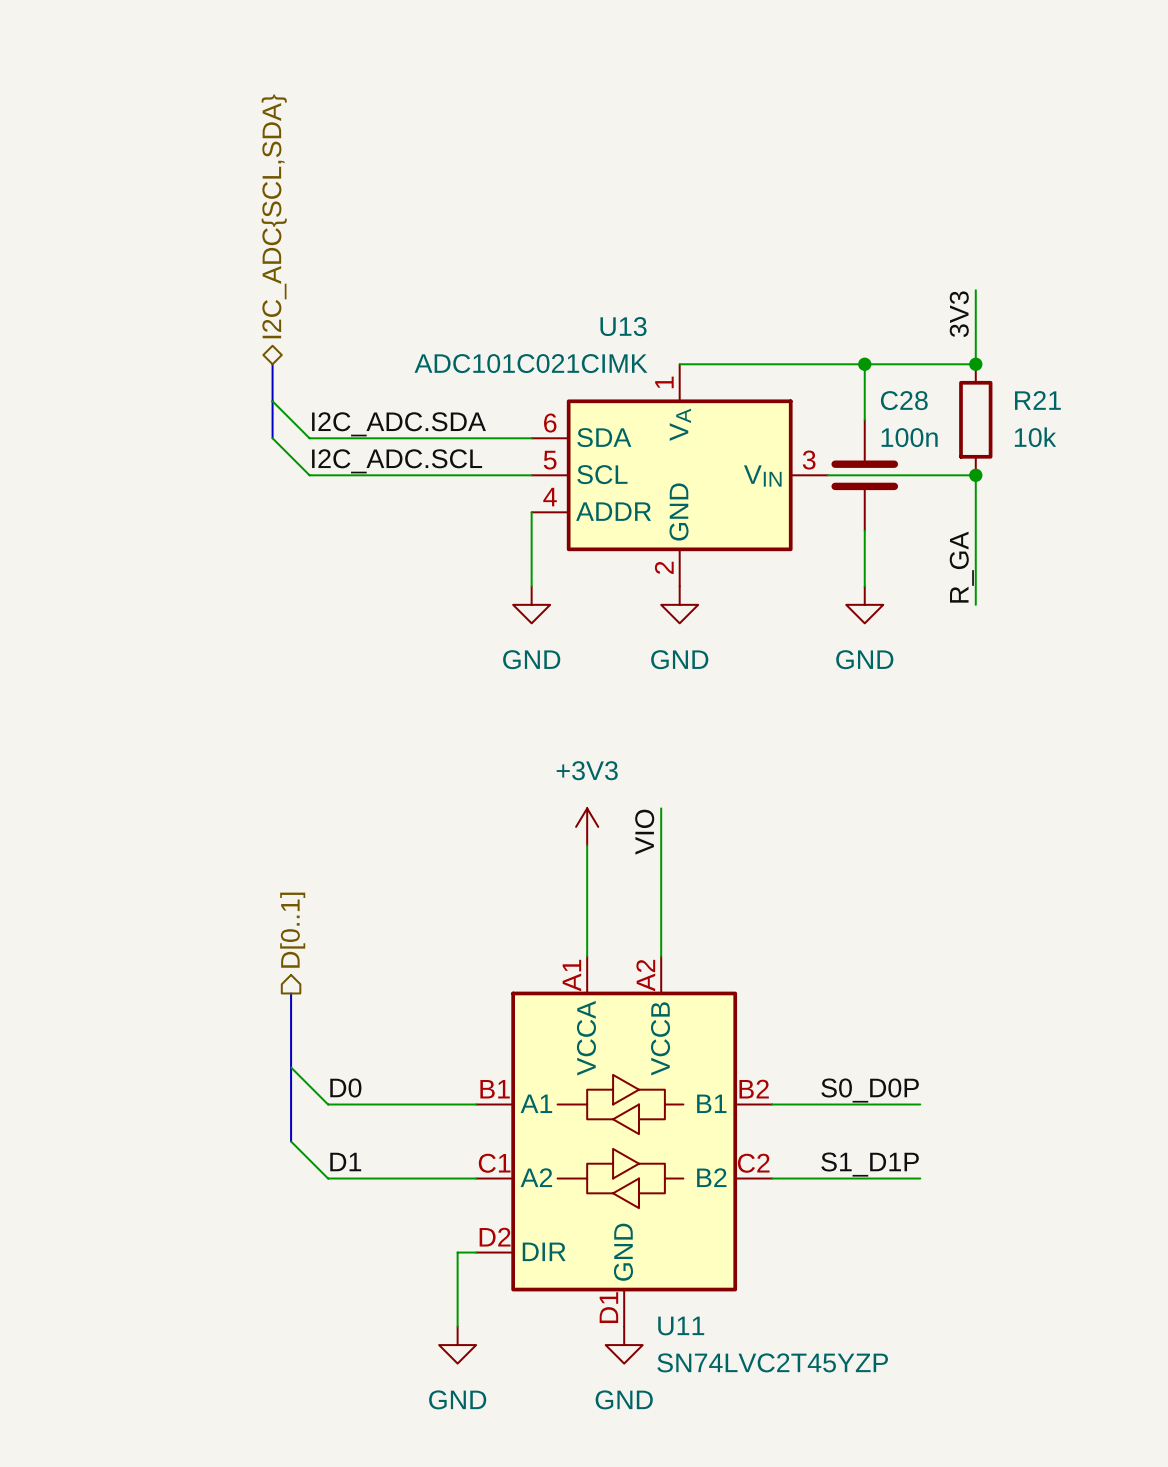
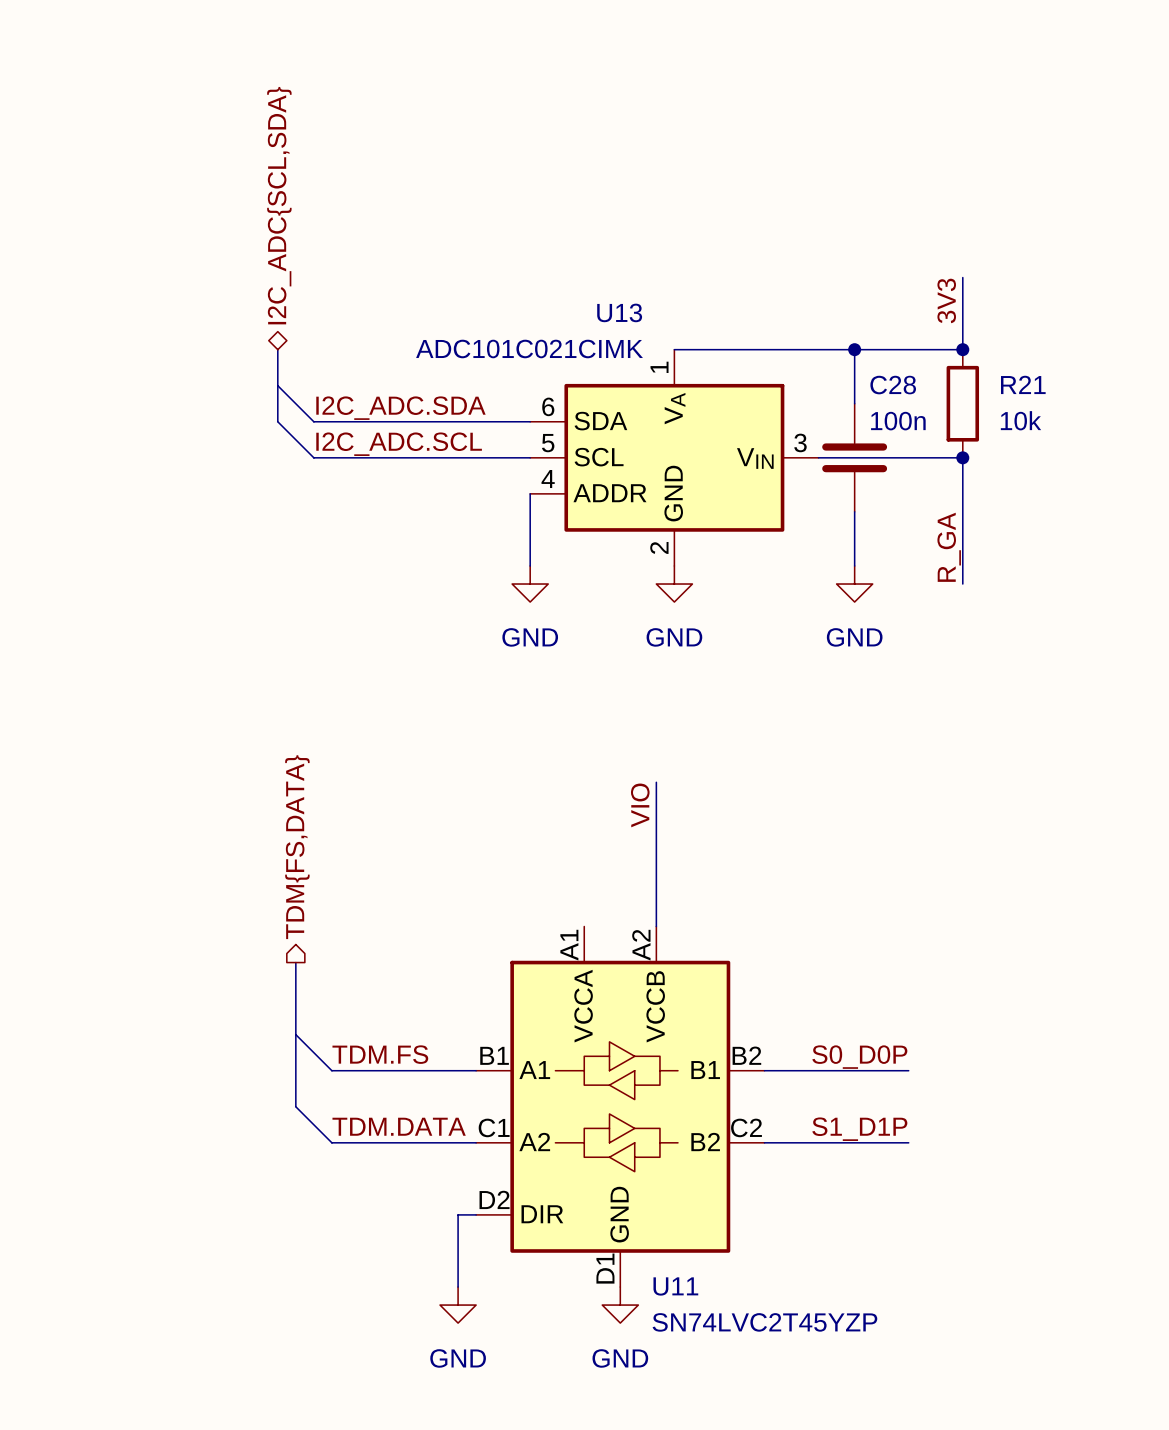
power symbol: +3V3 (587, 826) -> none
wire: (587, 845) (587, 956) -> none
hierarchical label: D[0..1] (292, 930) -> TDM{FS,DATA} (297, 847)
label: D0 (345, 1087) -> TDM.FS (380, 1054)
label: D1 (345, 1162) -> TDM.DATA (399, 1126)

